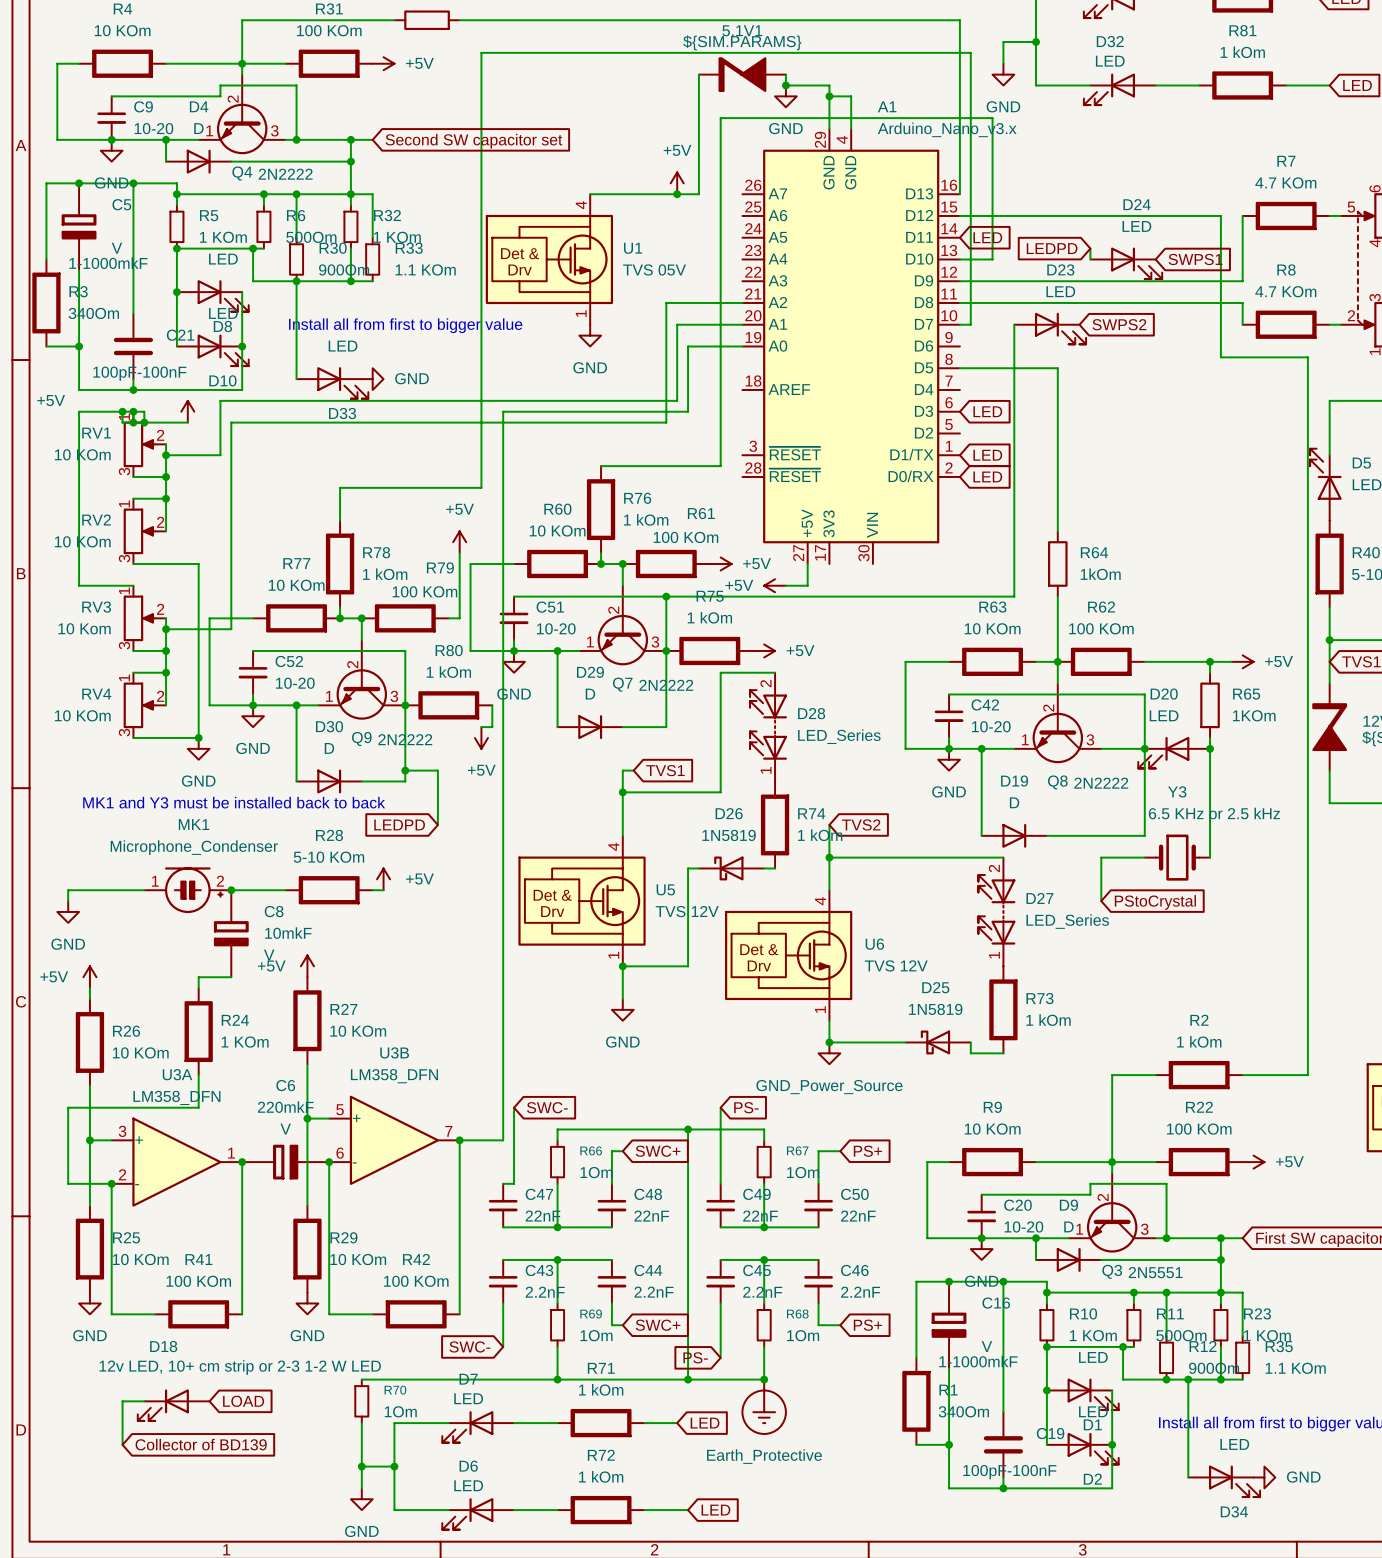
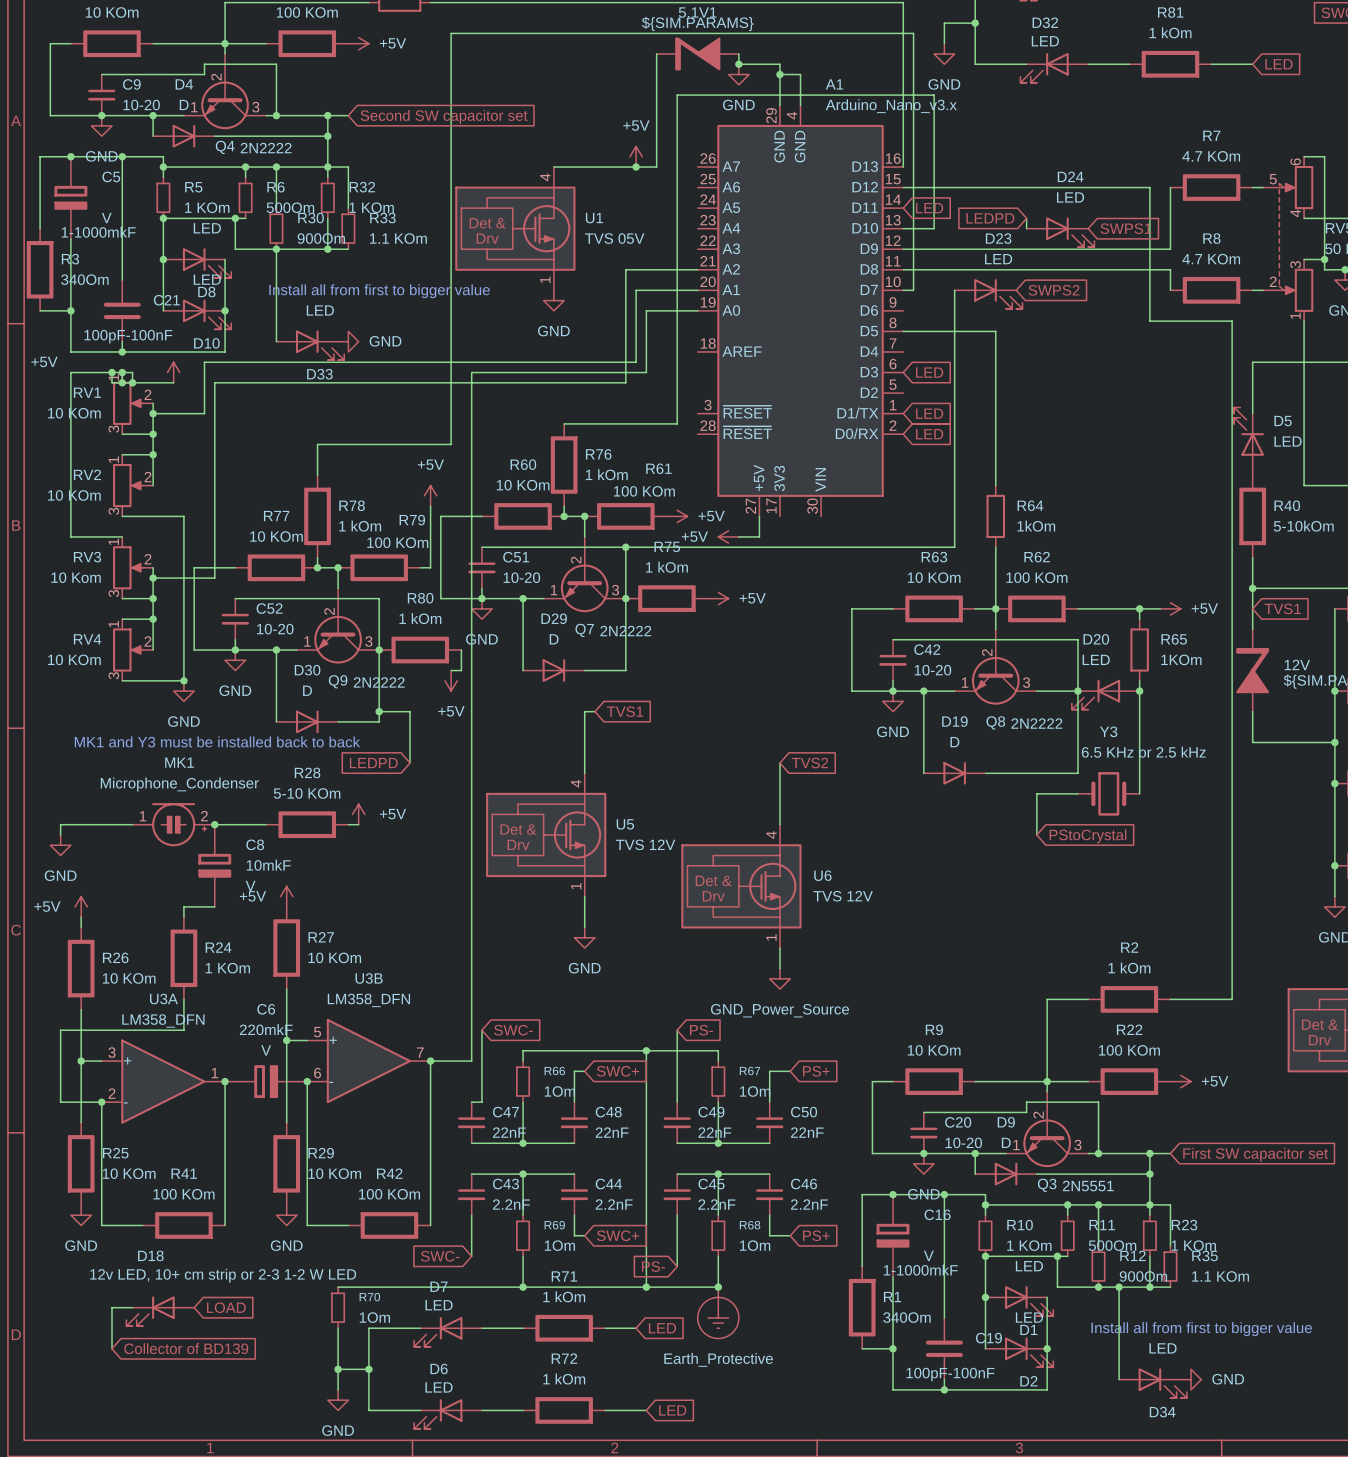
wire: (775, 672) (720, 672) (720, 792) (622, 792) -> none
D28: LED_Series (768, 727) -> none
junction: (622, 792) -> none
R74: 1 kOm (775, 824) -> none
wire: (829, 857) (1003, 857) -> none
junction: (829, 857) -> none
wire: (698, 868) (688, 868) (688, 966) (622, 966) -> none
D26: 1N5819 (731, 868) -> none
wire: (764, 868) (775, 868) -> none
D27: LED_Series (996, 911) -> none
junction: (622, 966) -> none
R73: 1 kOm (1003, 1009) -> none
wire: (829, 1042) (905, 1042) -> none
junction: (829, 1042) -> none
D25: 1N5819 (938, 1042) -> none
wire: (970, 1042) (970, 1053) (1003, 1053) -> none

